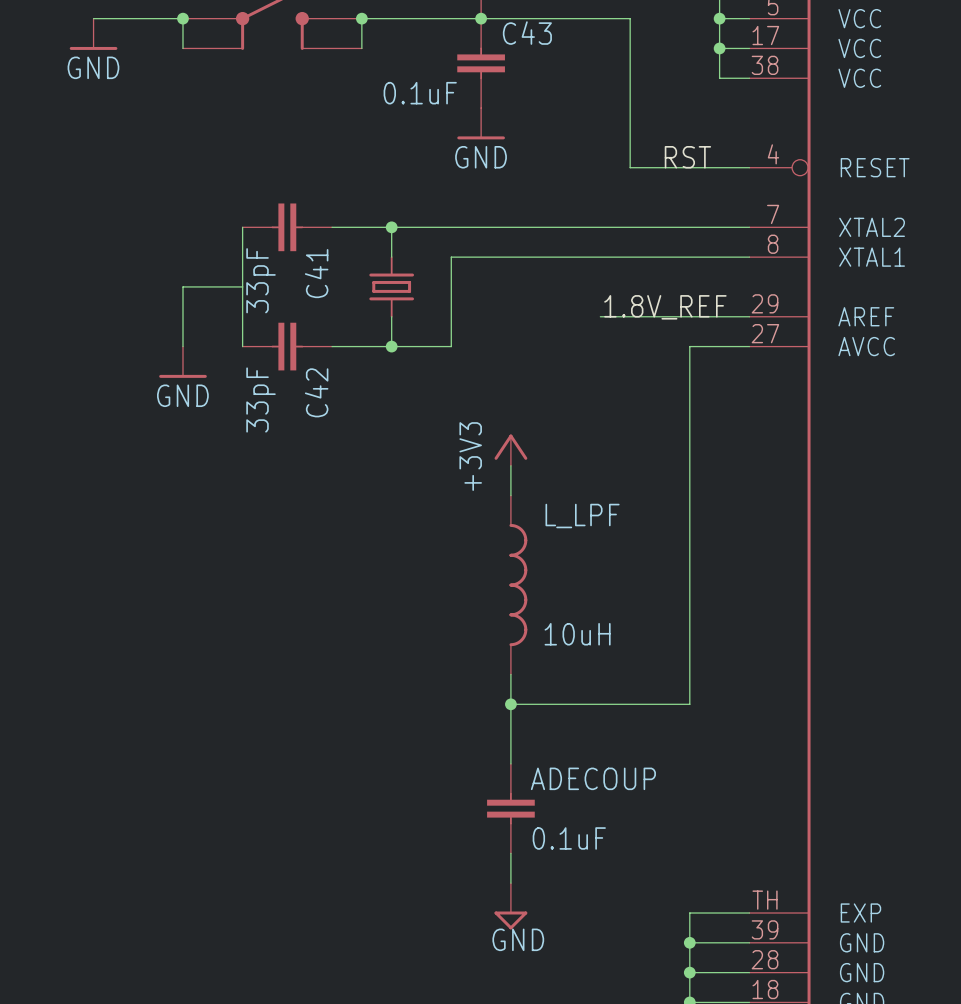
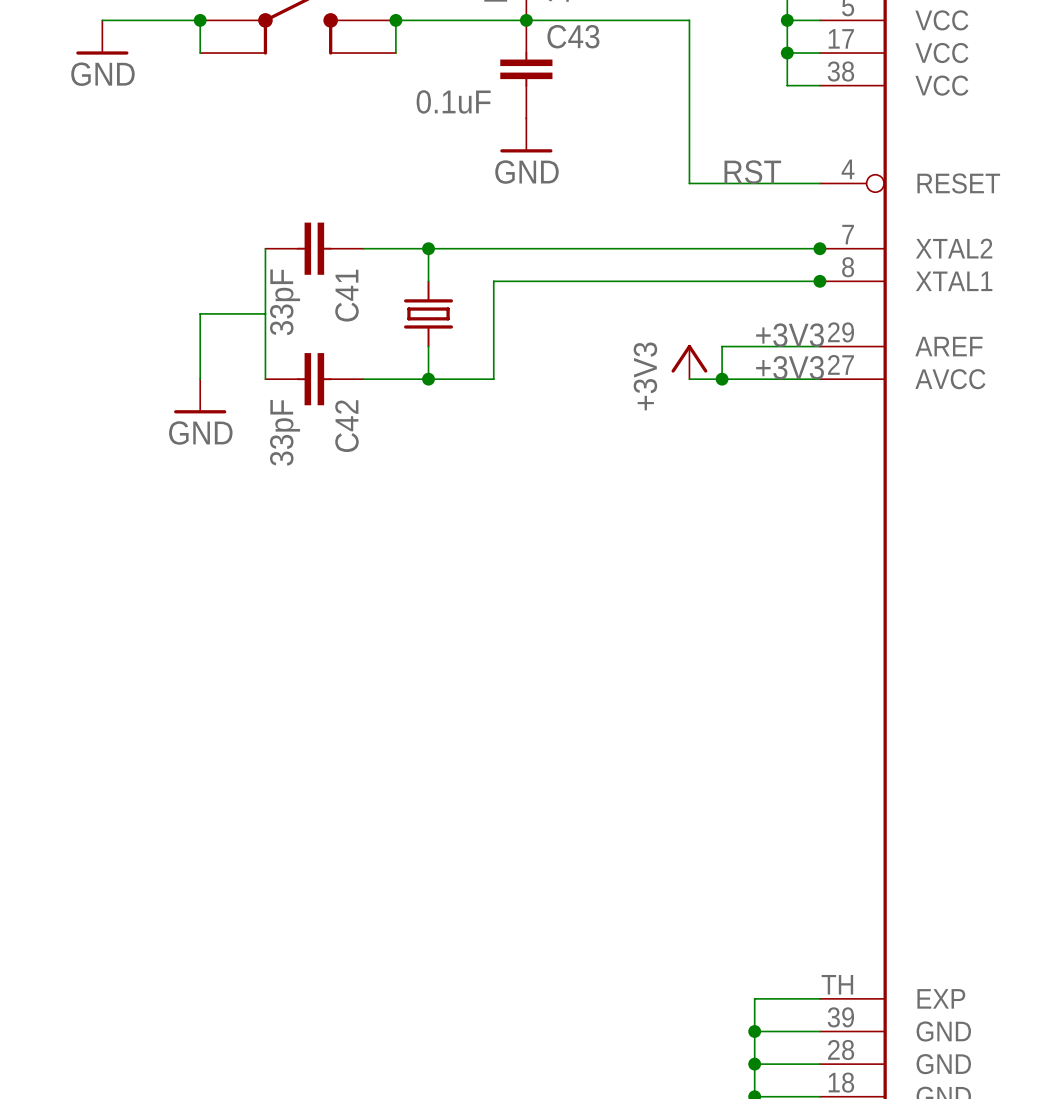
junction: none -> (819, 248)
junction: none -> (819, 281)
label: none -> +3V3 (790, 335)
label: 1.8V_REF (665, 307) -> none
wire: (600, 316) (659, 316) -> (722, 379) (722, 346)
label: none -> +3V3 (790, 367)
junction: none -> (722, 379)
wire: (689, 346) (689, 704) (510, 704) -> (754, 379) (689, 379)
power symbol position: +3V3 (510, 450) -> +3V3 (689, 362)
wire: (510, 465) (510, 495) -> none
L_LPF: 10uH (518, 585) -> none
wire: (510, 674) (510, 763) -> none
junction: (510, 704) -> none
ADECOUP: 0.1uF (510, 808) -> none
wire: (510, 853) (510, 883) -> none
power symbol: GND (510, 906) -> none

